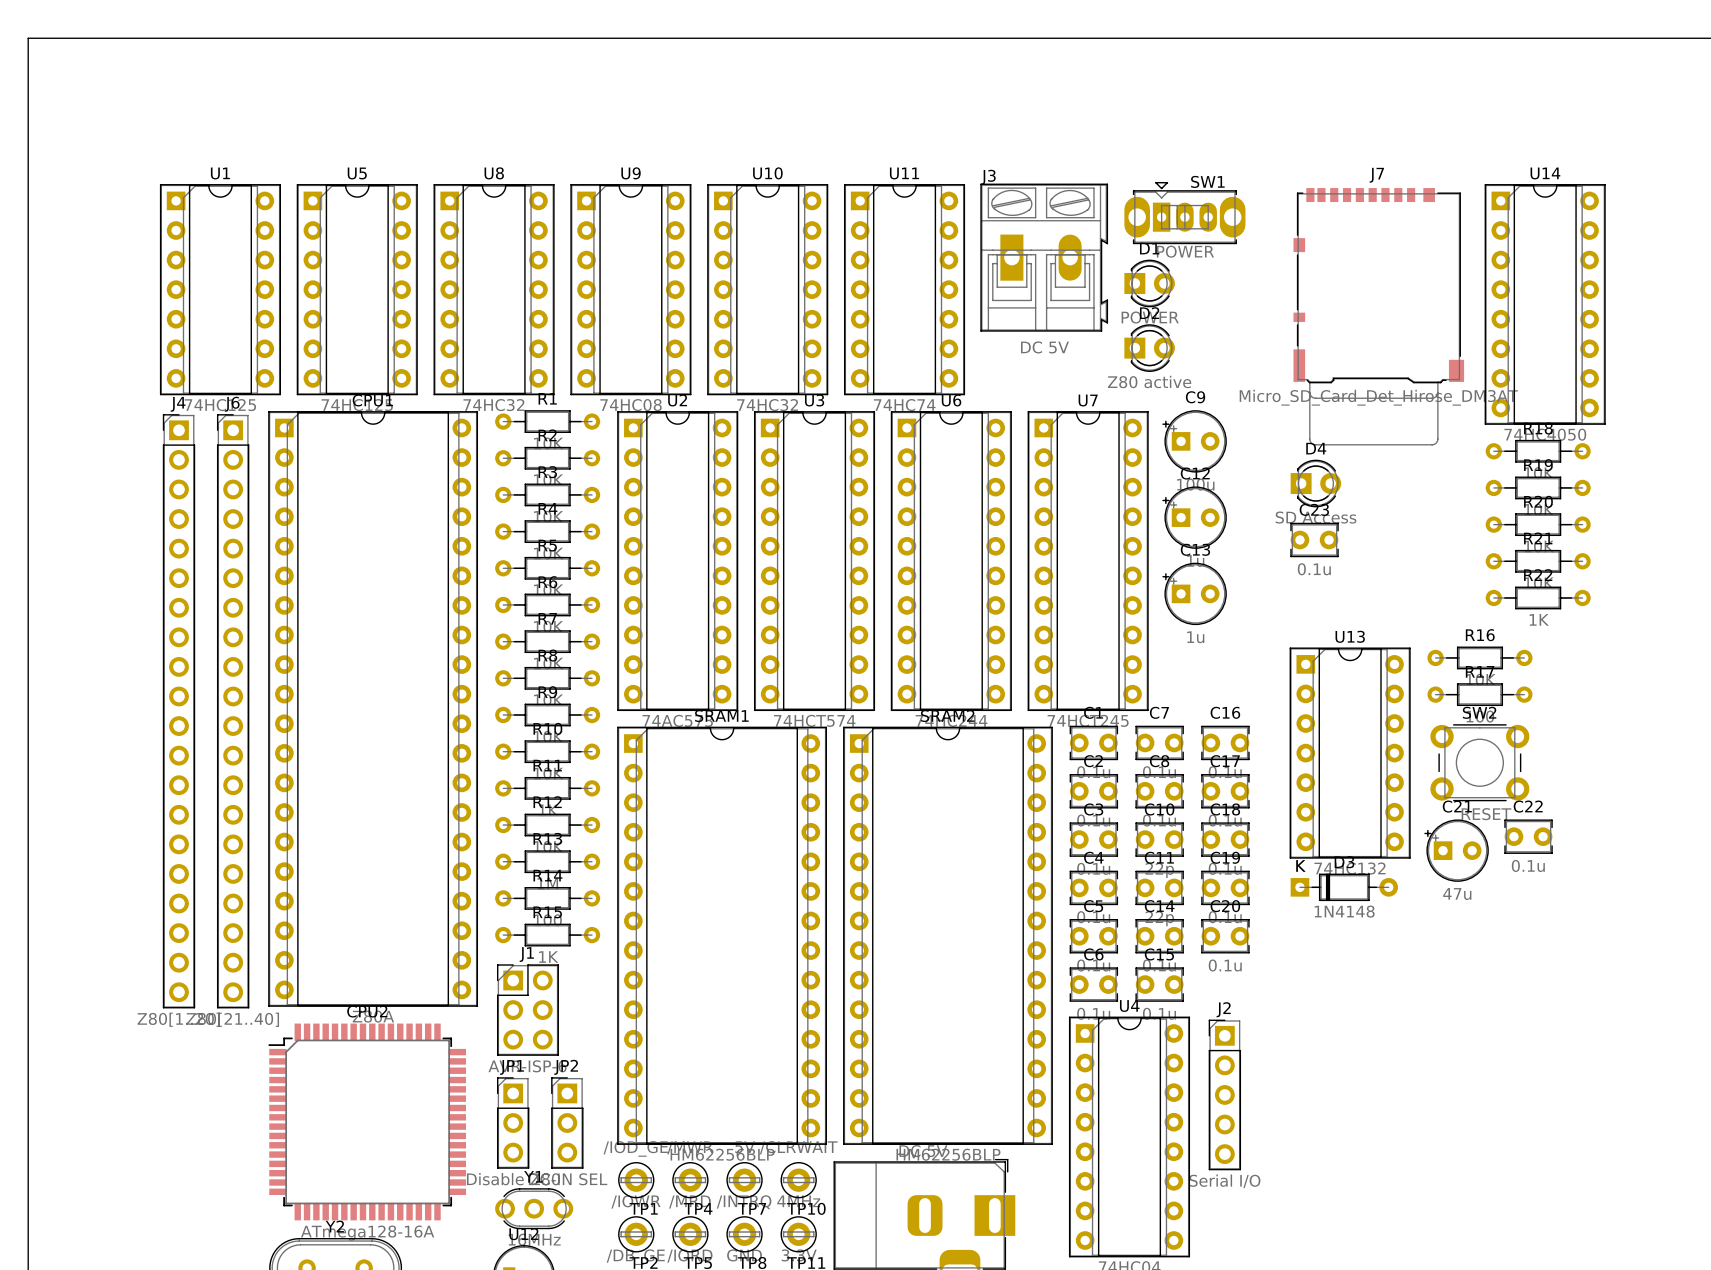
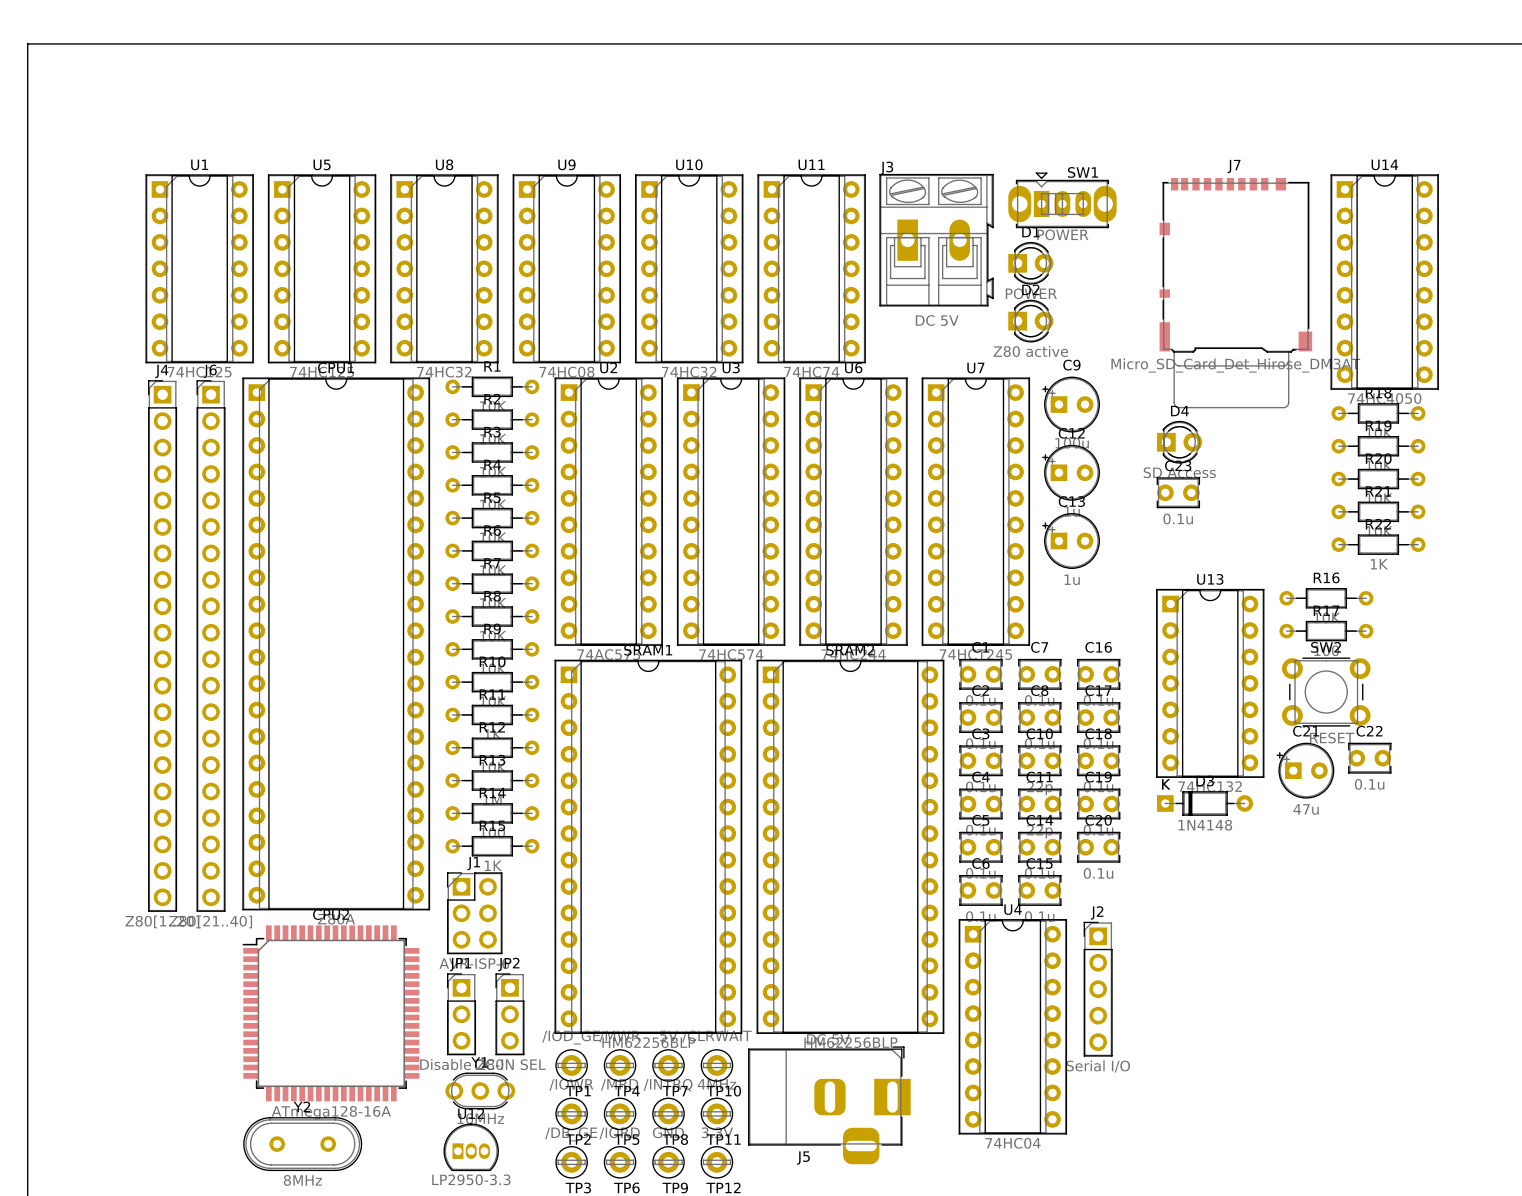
U3 value: 74HCT574 (814, 720) -> 74HC574 (731, 654)

